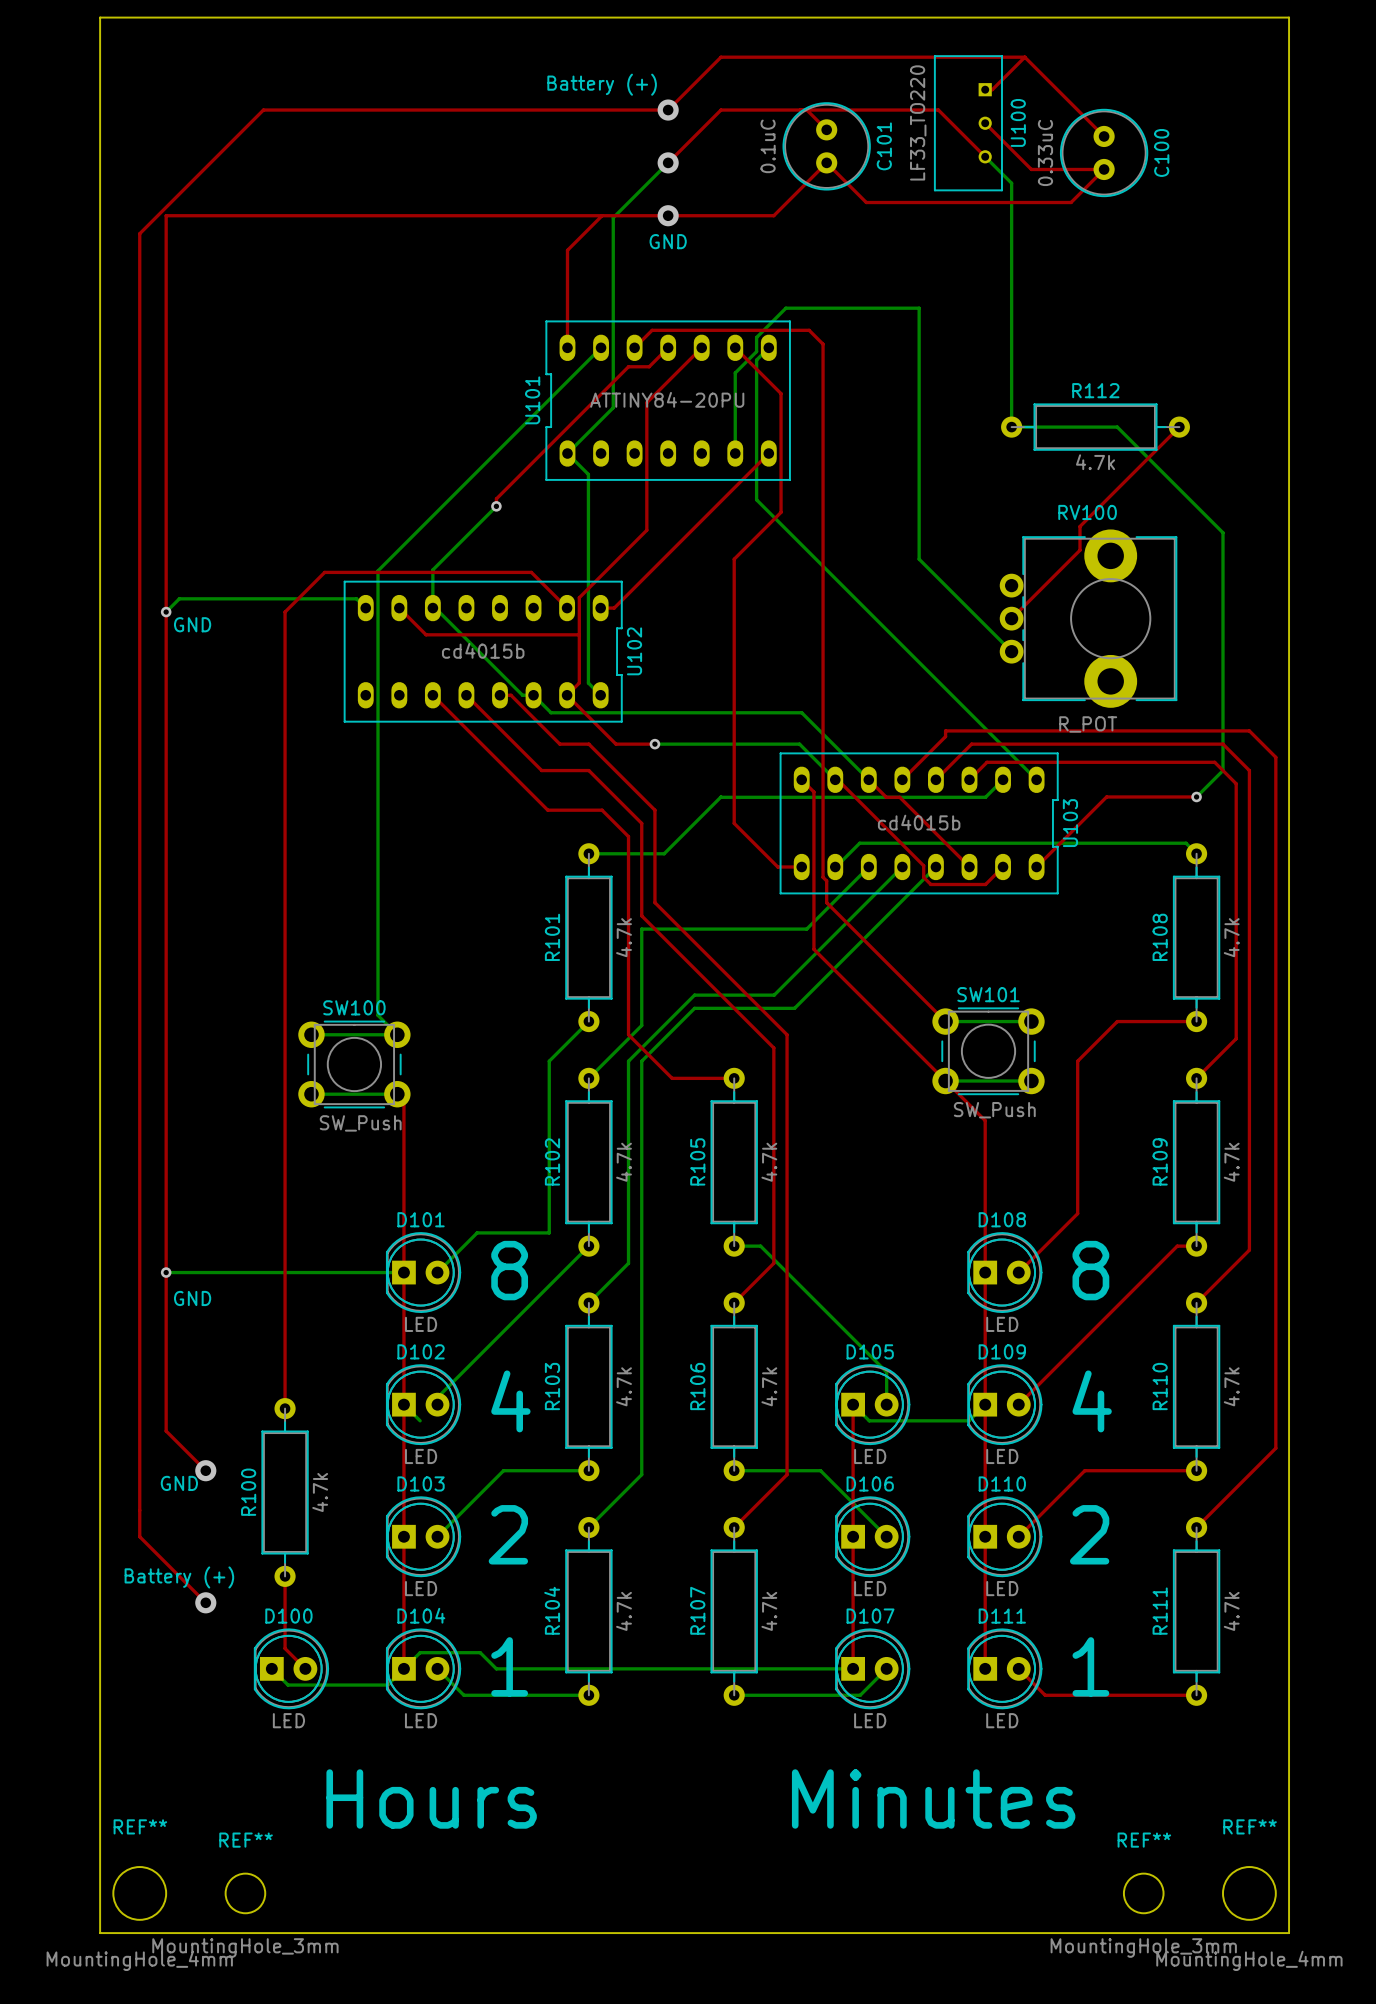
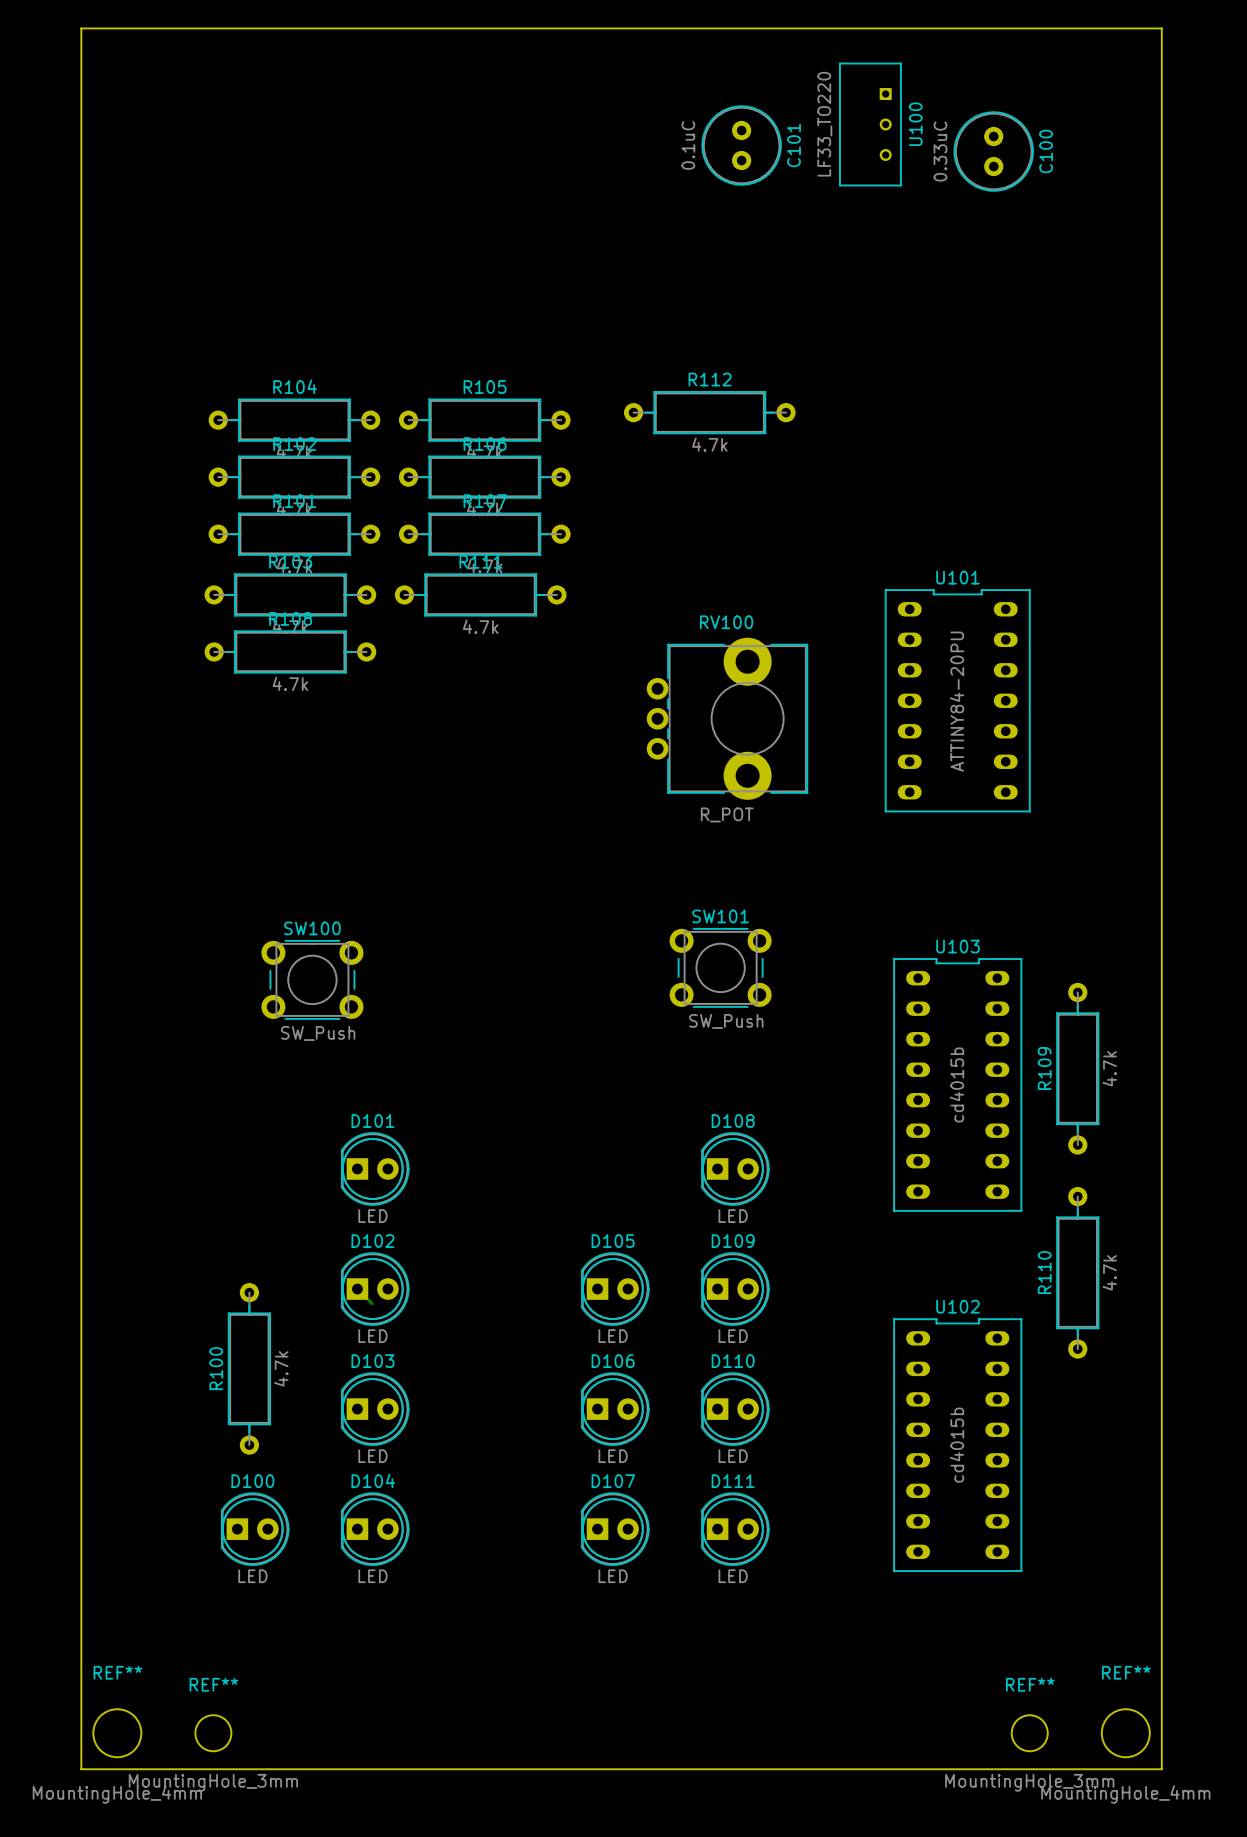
top track: (1024, 57) (1104, 136) -> none
top track: (1024, 57) (721, 57) (668, 110) (263, 110) (139, 233) (139, 1536) (205, 1602) -> none
top track: (1024, 57) (992, 89) (985, 89) -> none
text: Battery (+) (602, 84) -> none
via: (668, 110) -> none
top track: (806, 110) (826, 129) -> none
top track: (985, 123) (1031, 169) (1104, 169) (1071, 202) (866, 202) (826, 162) (773, 215) (166, 215) (166, 1431) (205, 1470) -> none
top track: (985, 156) (938, 110) (721, 110) (668, 162) -> none
bottom track: (985, 156) (1011, 183) (1011, 427) (1117, 427) (1222, 532) (1222, 770) (1196, 796) -> none
bottom track: (668, 162) (613, 217) (613, 407) (567, 453) (588, 474) (588, 683) (600, 695) -> none
via: (668, 162) -> none
top track: (602, 215) (567, 250) (567, 347) -> none
via: (668, 215) -> none
text: GND (668, 241) -> none
bottom track: (601, 347) (377, 570) (377, 1015) (397, 1034) (311, 1034) -> none
top track: (634, 347) (652, 330) (809, 330) (823, 344) (823, 877) (826, 880) (826, 902) (945, 1021) -> none
top track: (668, 347) (649, 366) (628, 366) (496, 498) (496, 506) -> none
top track: (701, 347) (646, 402) (646, 530) (579, 597) (579, 683) (567, 695) (615, 744) (654, 744) -> none
top track: (735, 347) (781, 393) (781, 512) (734, 559) (734, 823) (777, 866) (801, 866) -> none
bottom track: (768, 347) (756, 360) (756, 499) (1036, 779) -> none
U101 rotation: 0° (668, 400) -> 90° clockwise (957, 700)
U101 position: (668, 400) -> (957, 700)
R112 position: (1095, 427) -> (709, 412)
top track: (1179, 427) (1079, 526) (1079, 550) (1011, 618) -> none
bottom track: (735, 453) (735, 372) (756, 351) (756, 337) (785, 308) (919, 308) (919, 559) (1011, 651) -> none
top track: (768, 453) (614, 608) (600, 608) -> none
bottom track: (496, 506) (432, 569) (432, 608) (435, 608) (522, 695) (533, 695) (551, 712) (801, 712) (868, 779) -> none
via: (496, 506) -> none
bottom track: (365, 608) (356, 598) (179, 598) (166, 612) -> none
top track: (399, 608) (426, 634) (579, 634) -> none
top track: (567, 608) (531, 572) (324, 572) (285, 612) (285, 1408) -> none
via: (166, 612) -> none
RV100 position: (1088, 618) -> (727, 718)
text: GND (192, 624) -> none
U102 rotation: 0° (483, 651) -> 90° counterclockwise (957, 1445)
U102 position: (483, 651) -> (957, 1445)
top track: (432, 695) (547, 810) (602, 810) (628, 836) (628, 1034) (672, 1078) (734, 1078) -> none
top track: (466, 695) (541, 770) (588, 770) (641, 823) (641, 915) (773, 1047) (773, 1263) (734, 1302) -> none
top track: (499, 695) (510, 695) (559, 744) (588, 744) (654, 810) (654, 902) (787, 1034) (787, 1474) (734, 1527) -> none
bottom track: (654, 744) (799, 744) (835, 779) -> none
via: (654, 744) -> none
top track: (801, 779) (813, 792) (813, 949) (985, 1120) (985, 1668) -> none
top track: (835, 779) (837, 779) (923, 865) (923, 877) (930, 884) (985, 884) (1003, 866) -> none
top track: (868, 779) (886, 797) (899, 797) (969, 866) -> none
top track: (902, 779) (945, 736) (945, 730) (1249, 730) (1275, 757) (1275, 1448) (1196, 1527) -> none
top track: (935, 779) (971, 744) (1222, 744) (1249, 770) (1249, 1250) (1196, 1302) -> none
top track: (969, 779) (986, 762) (1214, 762) (1236, 783) (1236, 1038) (1196, 1078) -> none
bottom track: (1003, 779) (985, 797) (721, 796) (664, 853) (588, 853) -> none
top track: (1196, 796) (1106, 796) (1036, 866) -> none
via: (1196, 796) -> none
U103 rotation: 0° (919, 823) -> 90° counterclockwise (957, 1084)
U103 position: (919, 823) -> (957, 1084)
bottom track: (1196, 853) (1186, 843) (859, 843) (835, 866) -> none
bottom track: (868, 866) (806, 929) (641, 929) (641, 1025) (588, 1078) -> none
bottom track: (902, 866) (774, 995) (694, 995) (628, 1061) (628, 1263) (588, 1302) -> none
bottom track: (935, 866) (794, 1008) (694, 1008) (641, 1061) (641, 1474) (588, 1527) -> none
R101 rotation: 0° (588, 937) -> 90° clockwise (294, 534)
R101 position: (588, 937) -> (294, 534)
R108 rotation: 0° (1196, 937) -> 90° clockwise (290, 651)
R108 position: (1196, 937) -> (290, 651)
bottom track: (588, 1021) (549, 1061) (549, 1232) (477, 1232) (437, 1272) -> none
bottom track: (945, 1021) (1031, 1021) -> none
top track: (1196, 1021) (1117, 1021) (1077, 1061) (1077, 1213) (1018, 1272) -> none
SW101 position: (988, 1051) -> (720, 967)
bottom track: (945, 1081) (1031, 1081) -> none
bottom track: (311, 1094) (397, 1094) -> none
top track: (397, 1094) (403, 1100) (403, 1668) -> none
R102 rotation: 0° (588, 1162) -> 90° clockwise (294, 477)
R102 position: (588, 1162) -> (294, 477)
R105 rotation: 0° (734, 1162) -> 90° clockwise (484, 420)
R105 position: (734, 1162) -> (484, 420)
bottom track: (588, 1246) (437, 1397) (437, 1404) -> none
bottom track: (734, 1246) (760, 1246) (886, 1372) (886, 1404) -> none
top track: (1196, 1246) (1177, 1246) (1018, 1404) -> none
text: 8 (509, 1270) -> none
text: 8 (1090, 1270) -> none
bottom track: (166, 1272) (403, 1272) -> none
via: (166, 1272) -> none
D108 position: (1004, 1272) -> (735, 1168)
text: GND (192, 1298) -> none
R103 rotation: 0° (588, 1386) -> 90° clockwise (290, 594)
R103 position: (588, 1386) -> (290, 594)
R106 rotation: 0° (734, 1386) -> 90° clockwise (484, 477)
R106 position: (734, 1386) -> (484, 477)
text: 4 (510, 1401) -> none
text: 4 (1092, 1401) -> none
top track: (853, 1404) (853, 1668) -> none
bottom track: (853, 1404) (869, 1420) (969, 1420) (985, 1404) -> none
D105 position: (872, 1404) -> (615, 1289)
D109 position: (1004, 1404) -> (735, 1289)
via: (205, 1470) -> none
bottom track: (588, 1470) (503, 1470) (437, 1536) -> none
bottom track: (734, 1470) (820, 1470) (886, 1536) -> none
top track: (1196, 1470) (1084, 1470) (1018, 1536) -> none
text: GND (179, 1483) -> none
text: 2 (508, 1534) -> none
text: 2 (1089, 1534) -> none
D106 position: (872, 1536) -> (615, 1409)
D110 position: (1004, 1536) -> (735, 1409)
top track: (285, 1576) (285, 1648) (305, 1668) -> none
text: Battery (+) (179, 1577) -> none
via: (205, 1602) -> none
R104 rotation: 0° (588, 1611) -> 90° clockwise (294, 420)
R104 position: (588, 1611) -> (294, 420)
R107 rotation: 0° (734, 1611) -> 90° clockwise (484, 534)
R107 position: (734, 1611) -> (484, 534)
R111 rotation: 0° (1196, 1611) -> 90° clockwise (480, 594)
R111 position: (1196, 1611) -> (480, 594)
text: 1 (509, 1666) -> none
text: 1 (1090, 1666) -> none
bottom track: (271, 1668) (288, 1685) (387, 1685) (420, 1652) (480, 1652) (496, 1668) (853, 1668) -> none
bottom track: (437, 1668) (463, 1695) (588, 1695) -> none
D107 position: (872, 1668) -> (615, 1529)
bottom track: (886, 1668) (860, 1695) (734, 1695) -> none
D111 position: (1004, 1668) -> (735, 1529)
top track: (1018, 1668) (1045, 1695) (1196, 1695) -> none
text: Hours (431, 1798) -> none
text: Minutes (933, 1798) -> none

